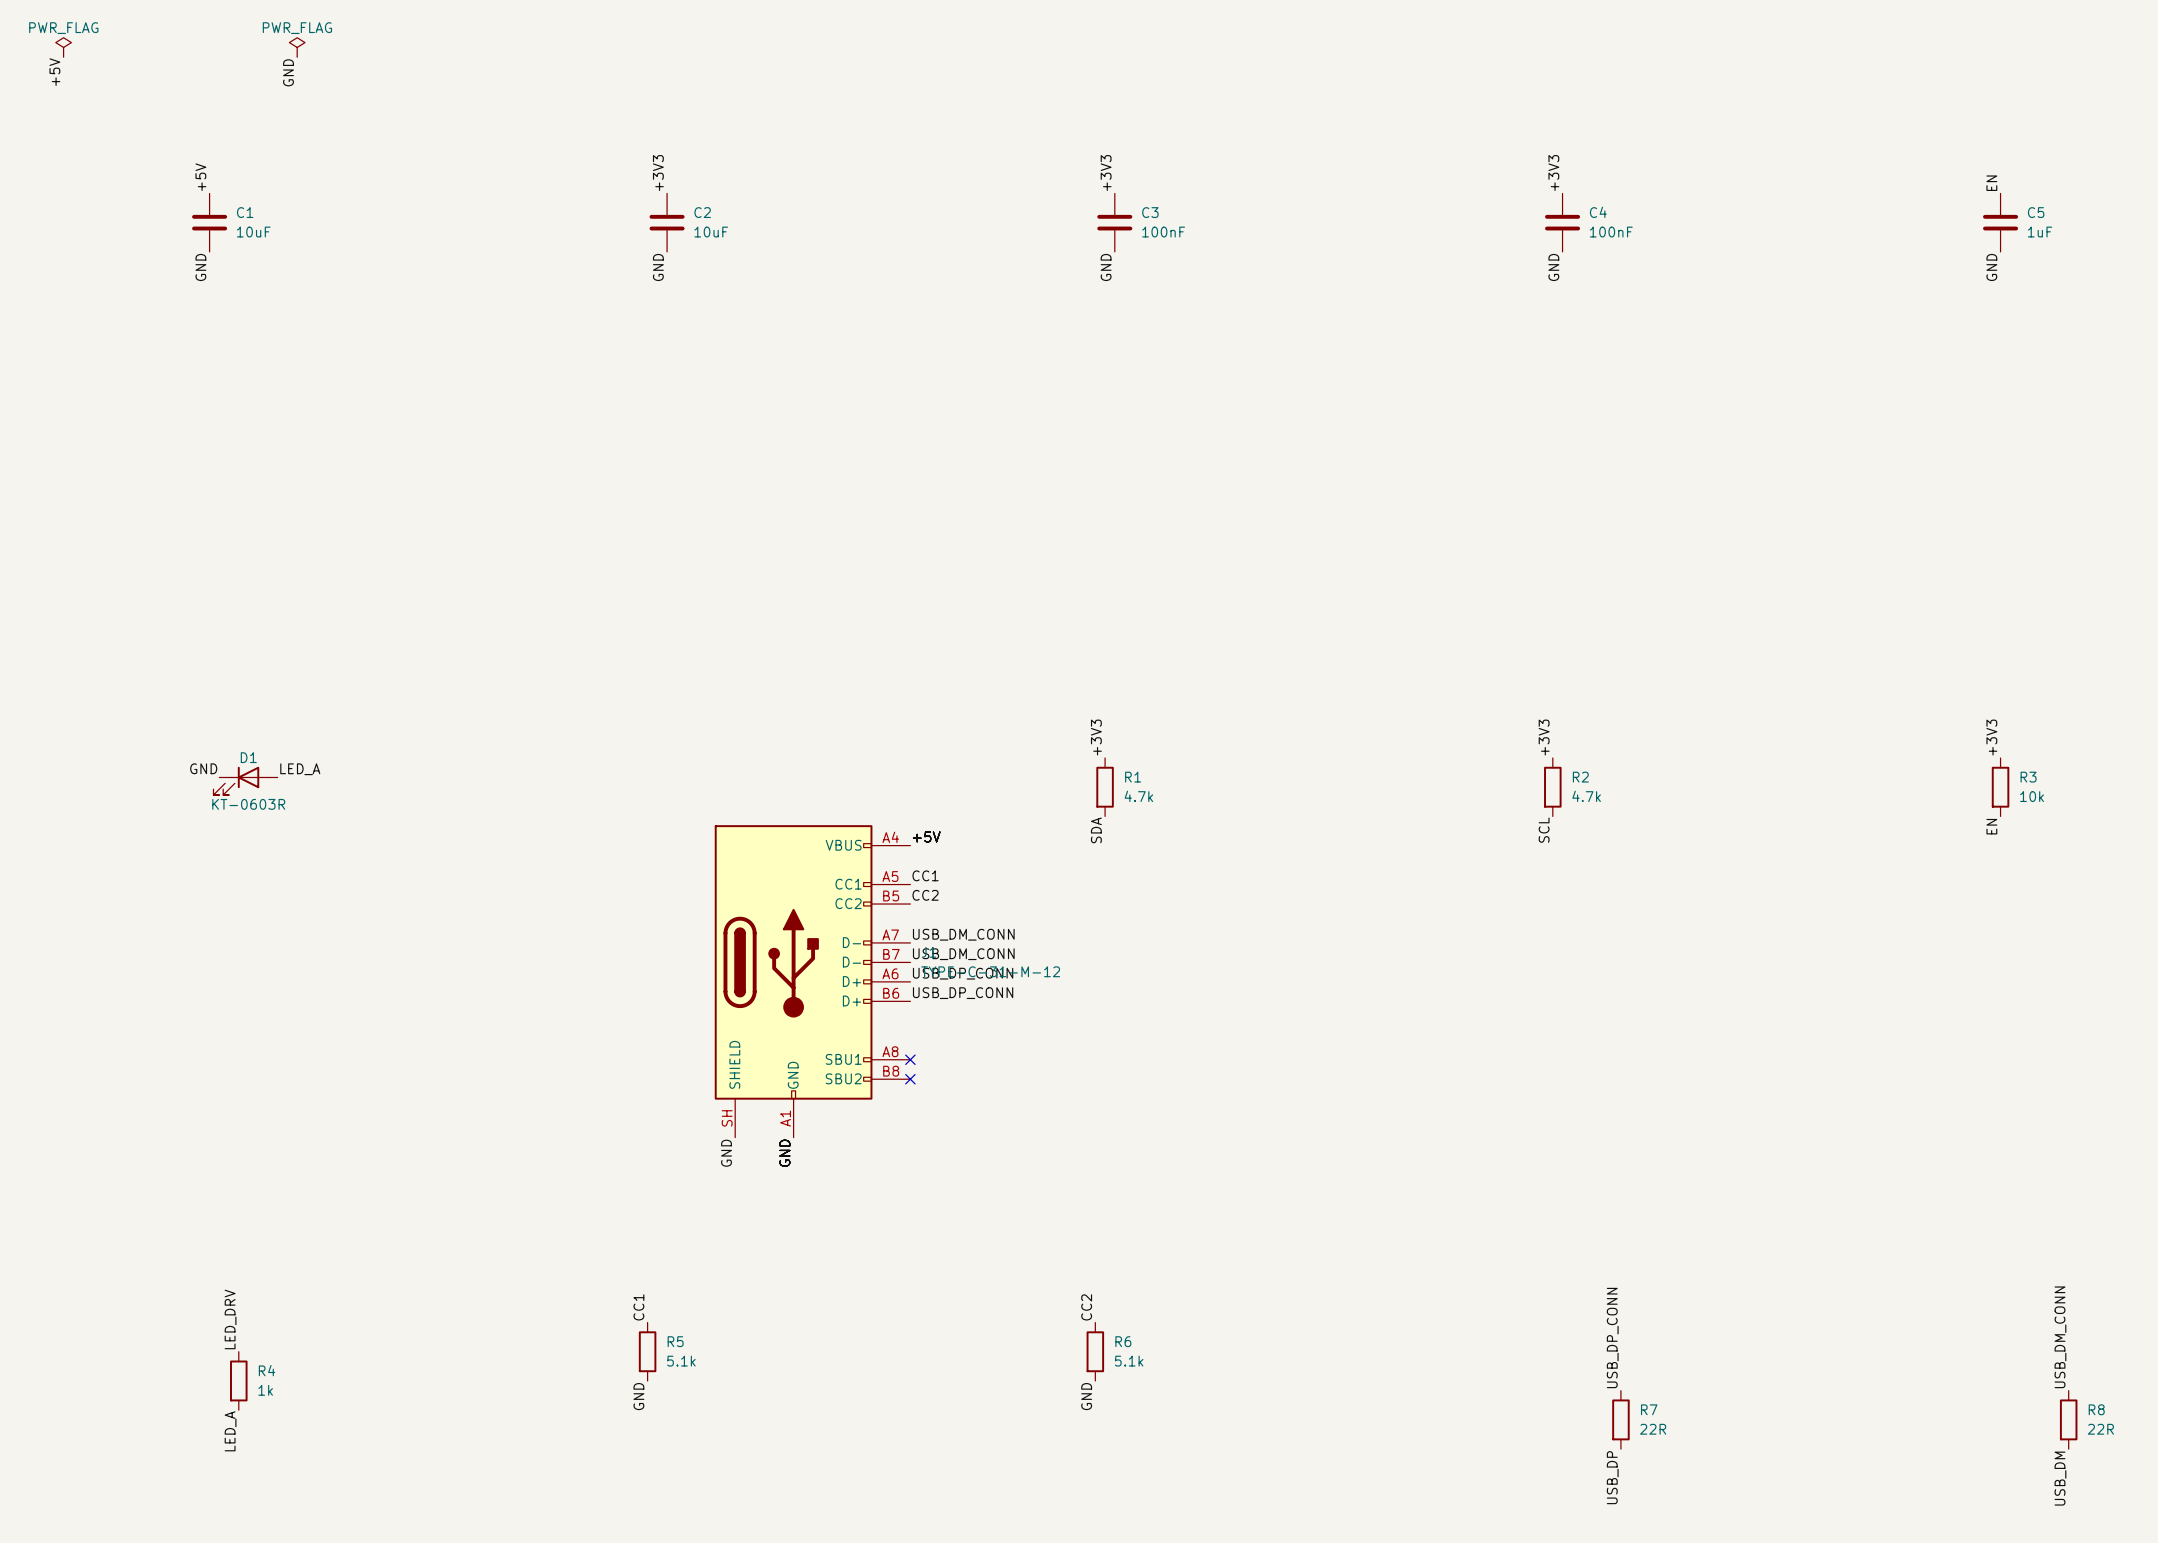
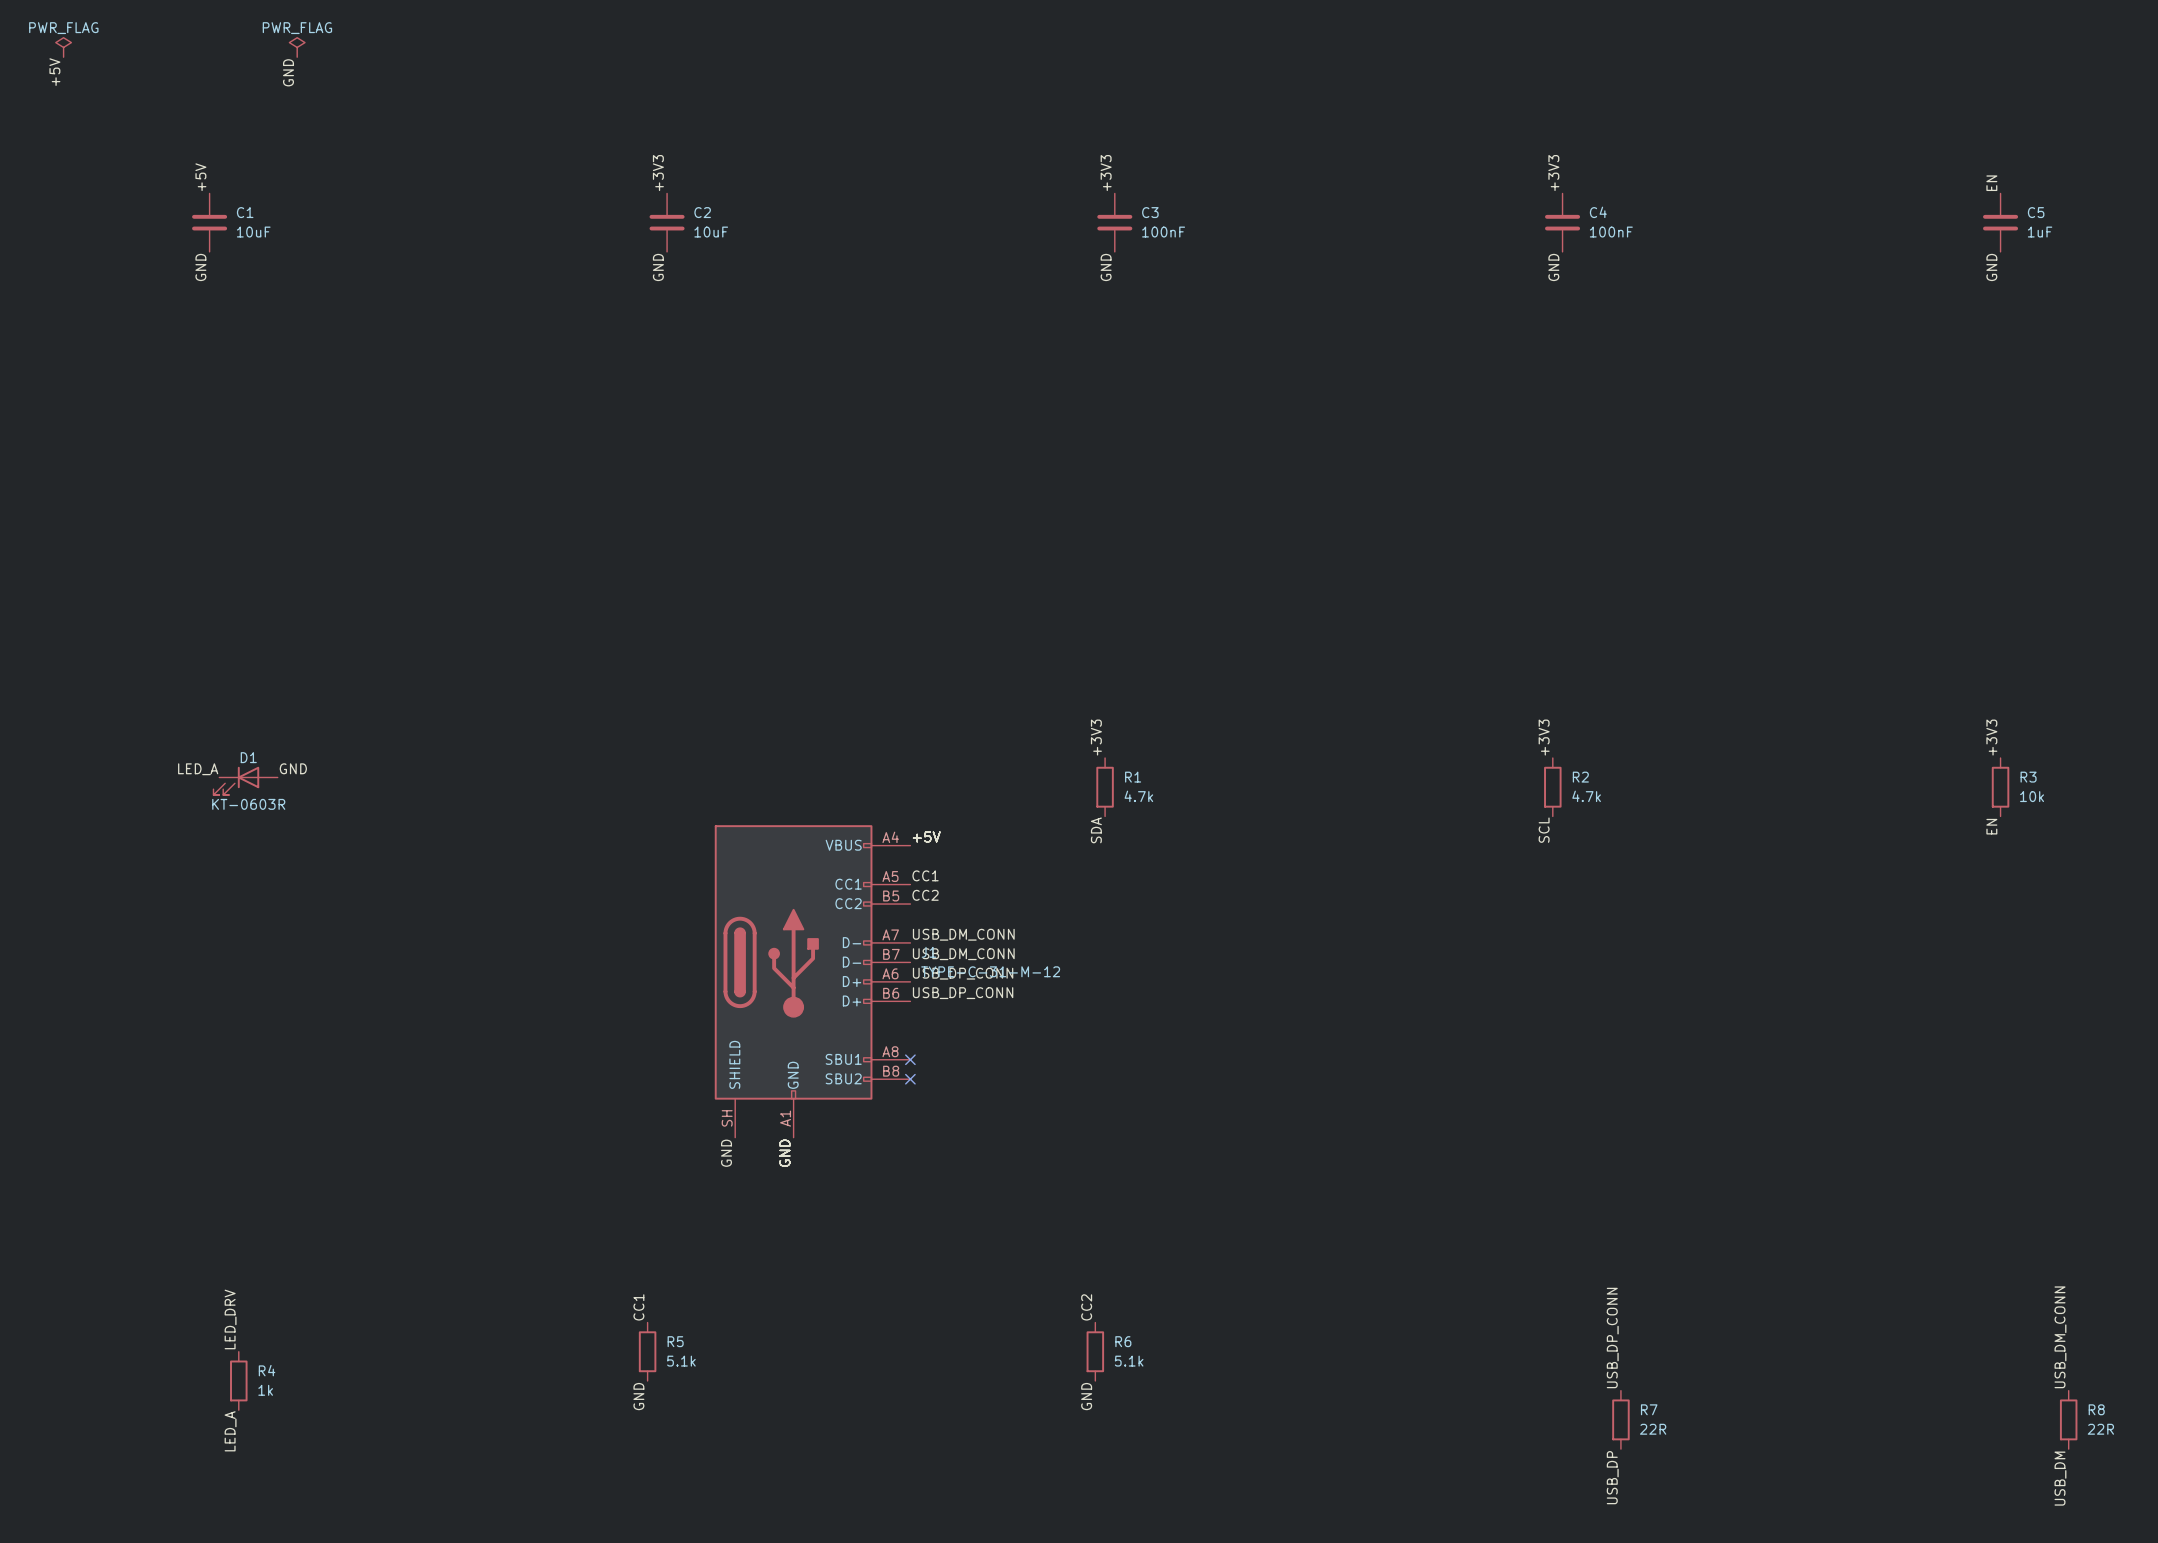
label: GND (203, 768) -> LED_A (198, 769)
label: LED_A (300, 769) -> GND (293, 768)

